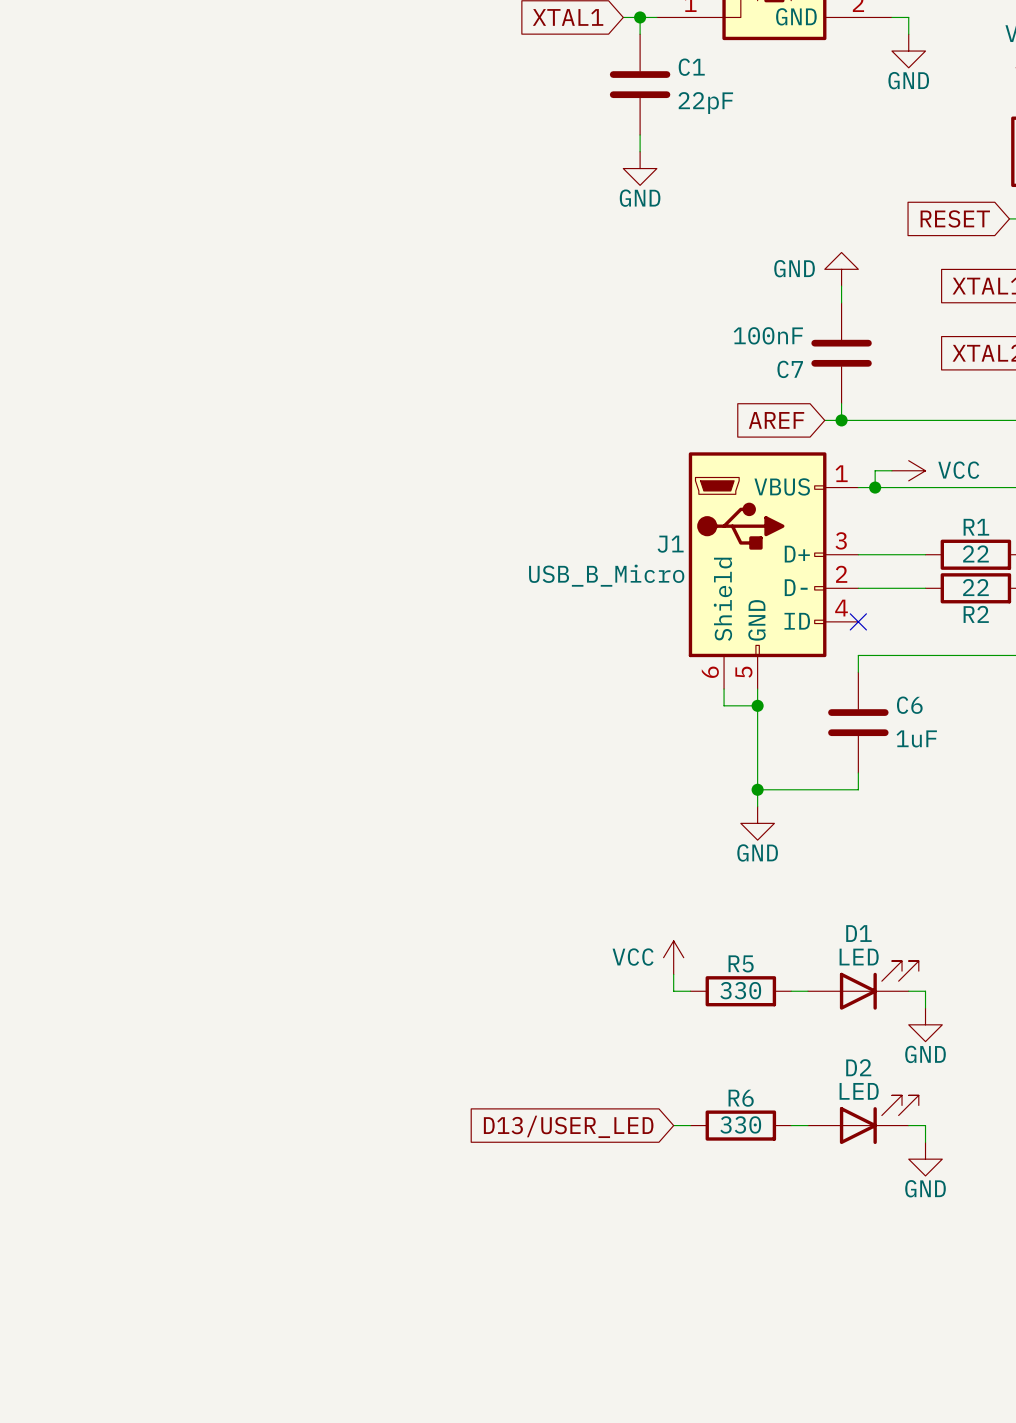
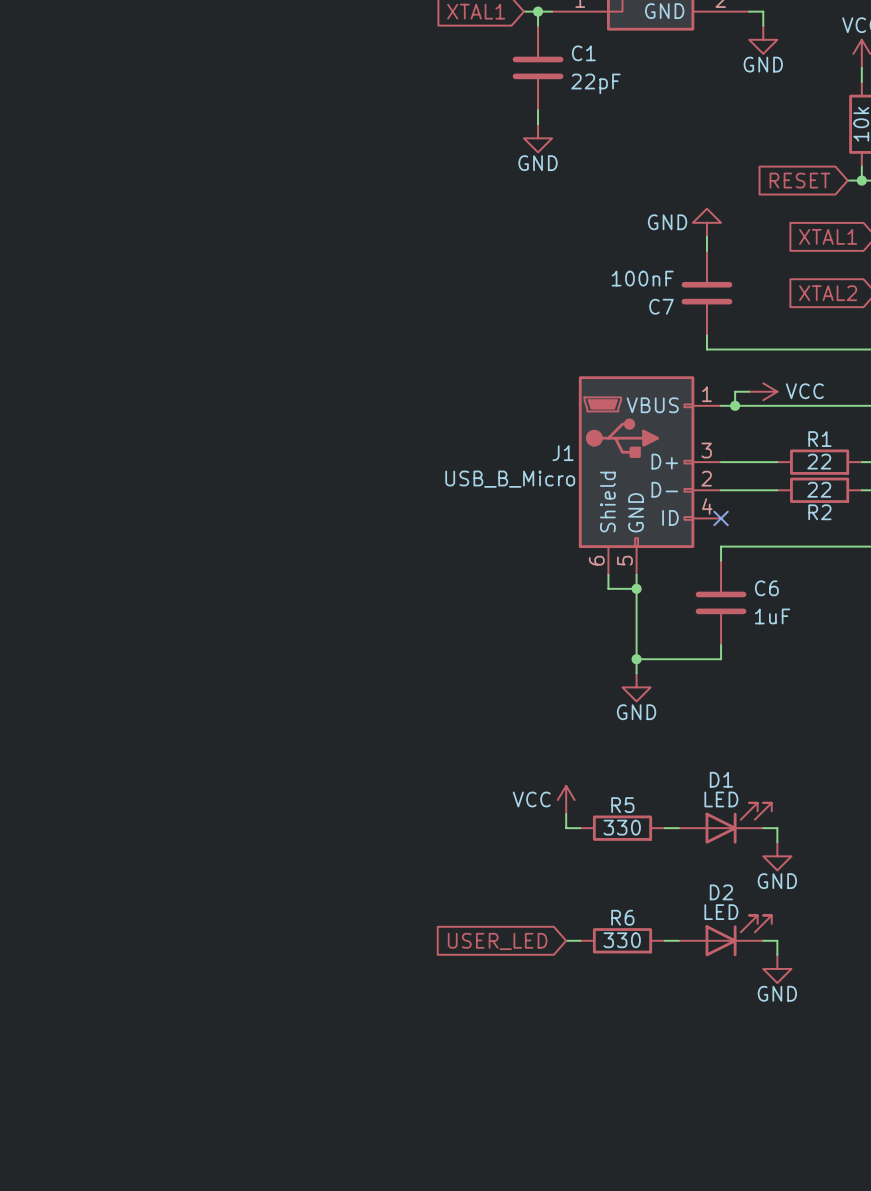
global label: AREF (776, 420) -> none
wire: (824, 420) (841, 420) -> none
junction: (841, 420) -> none
global label: D13/USER_LED (568, 1126) -> USER_LED (497, 941)

